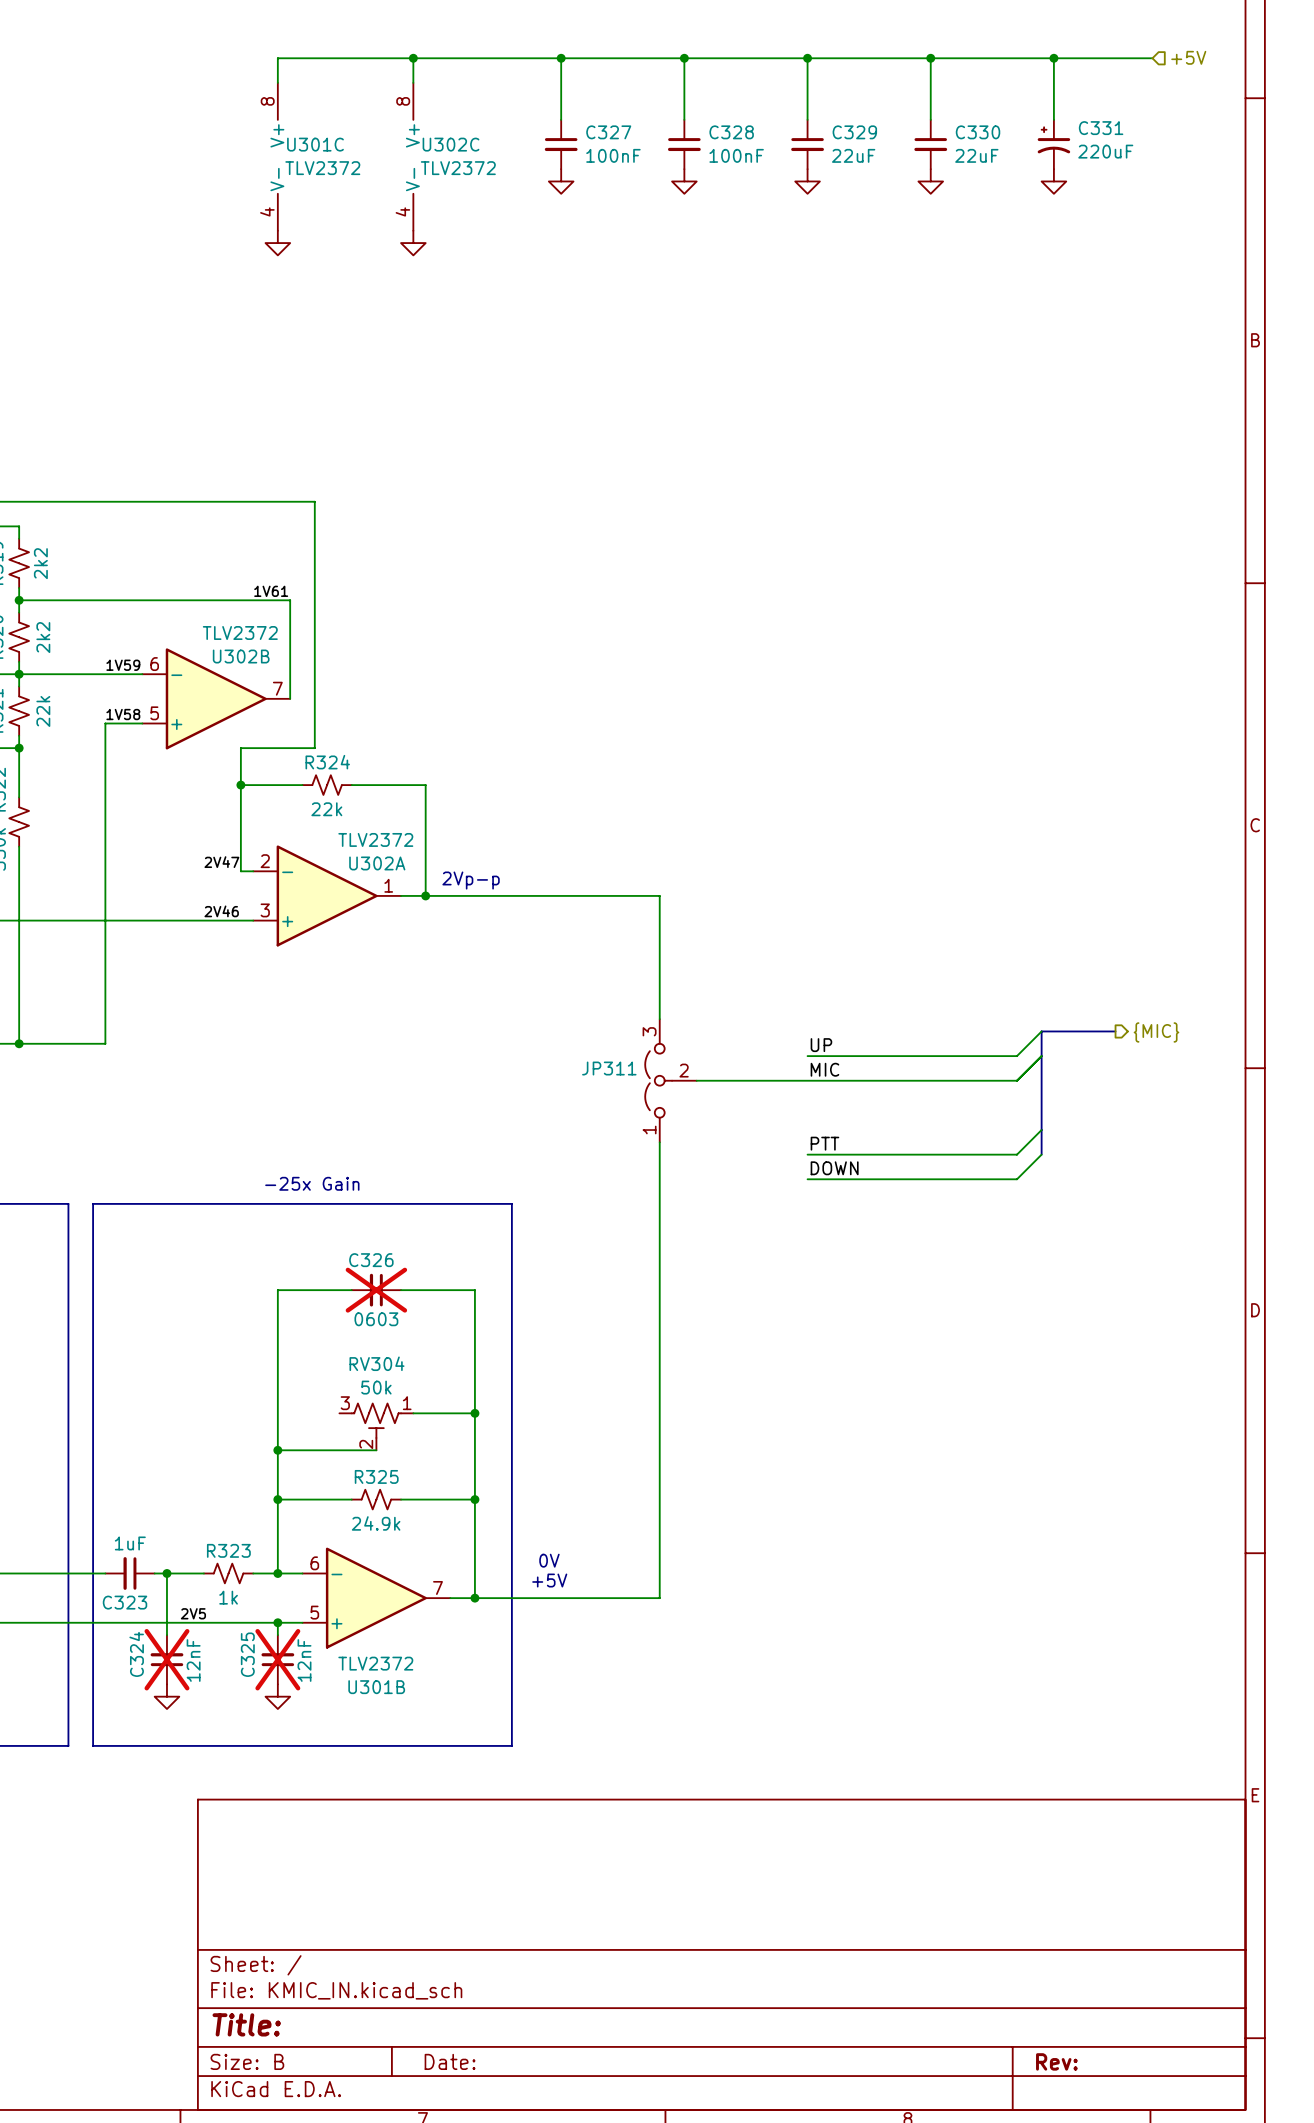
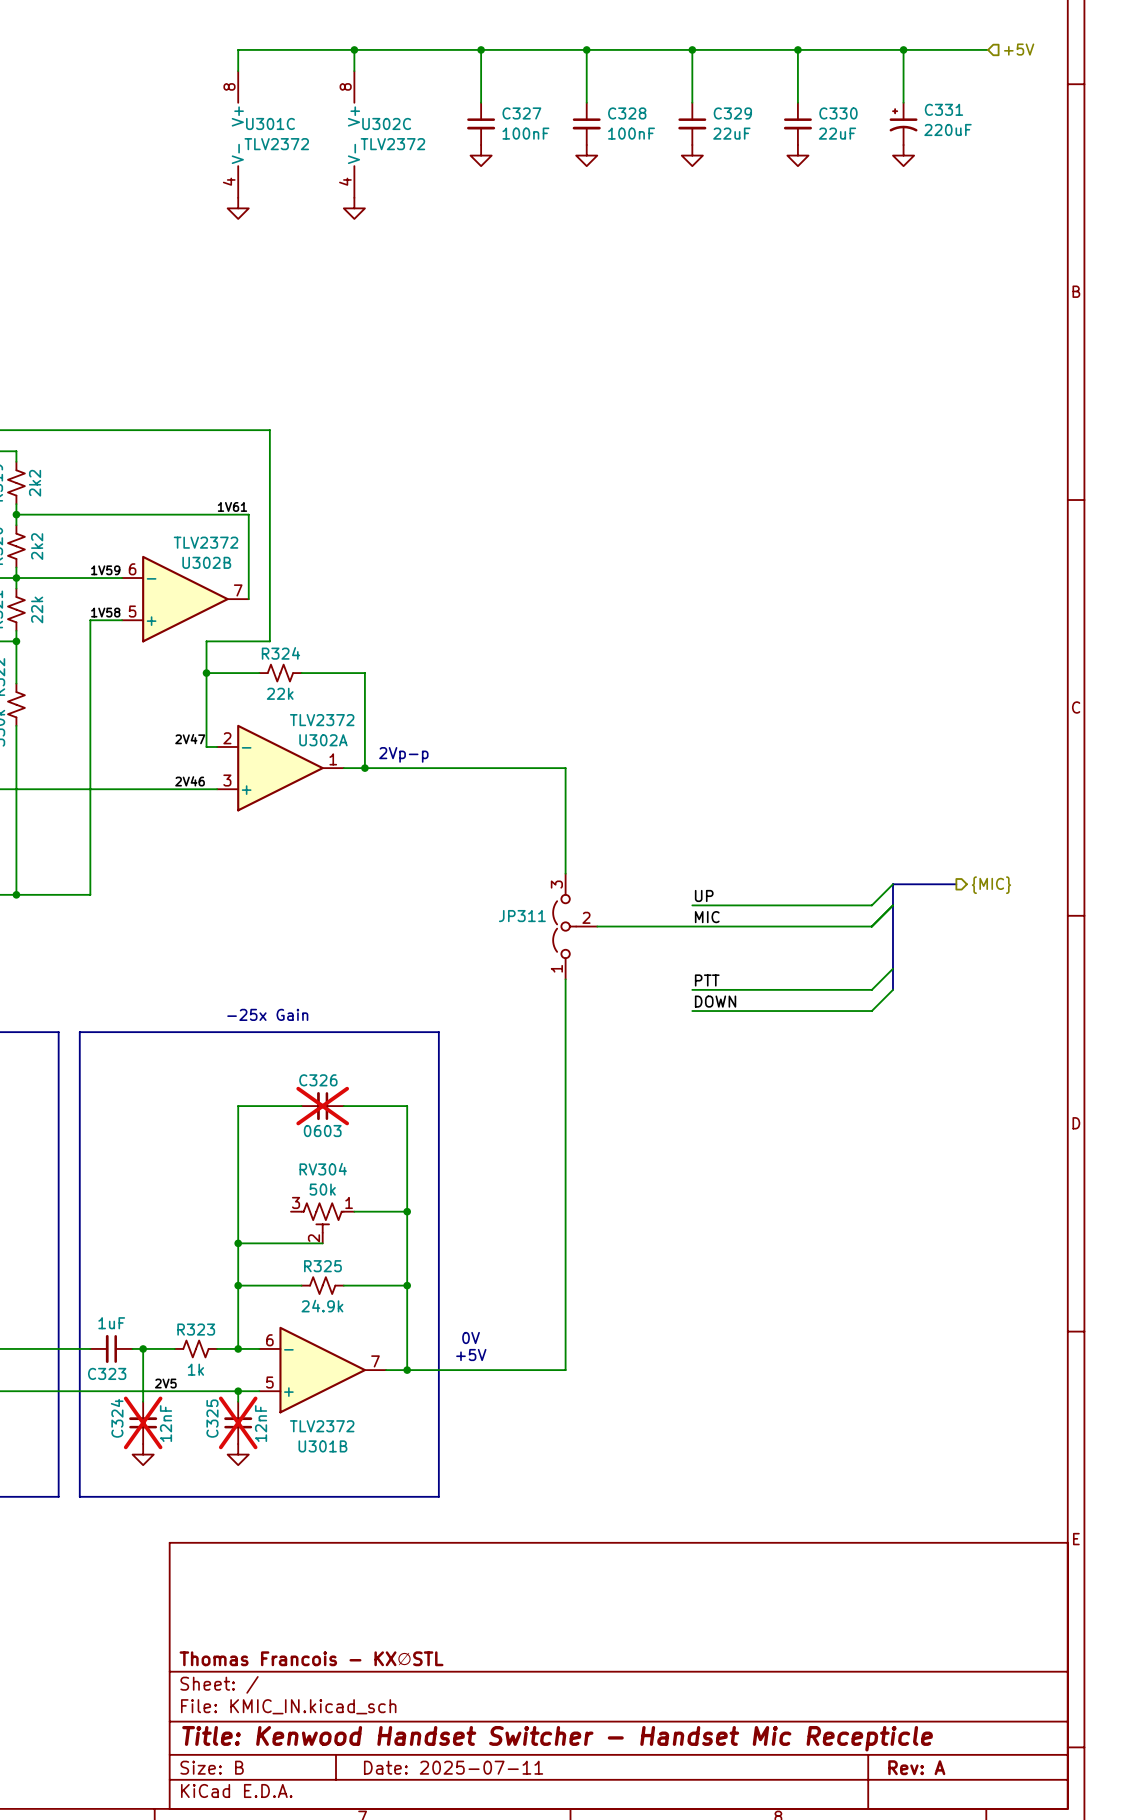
title block: none -> Thomas Francois - KX∅STL (311, 1658)
title block: Title: (246, 2024) -> Title: Kenwood Handset Switcher - Handset Mic Recepticle (557, 1738)
title block: Date: (450, 2061) -> Date: 2025-07-11 (453, 1767)
title block: Rev: (1056, 2061) -> Rev: A (916, 1767)

